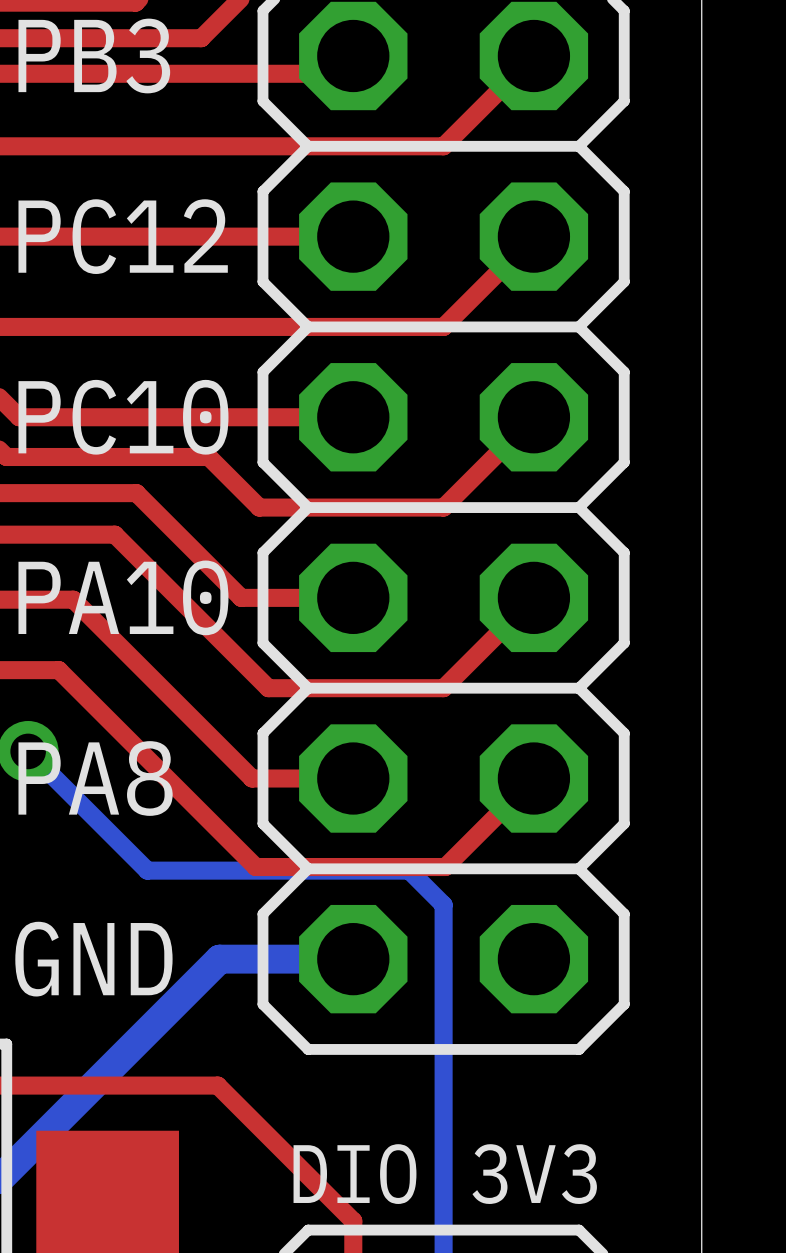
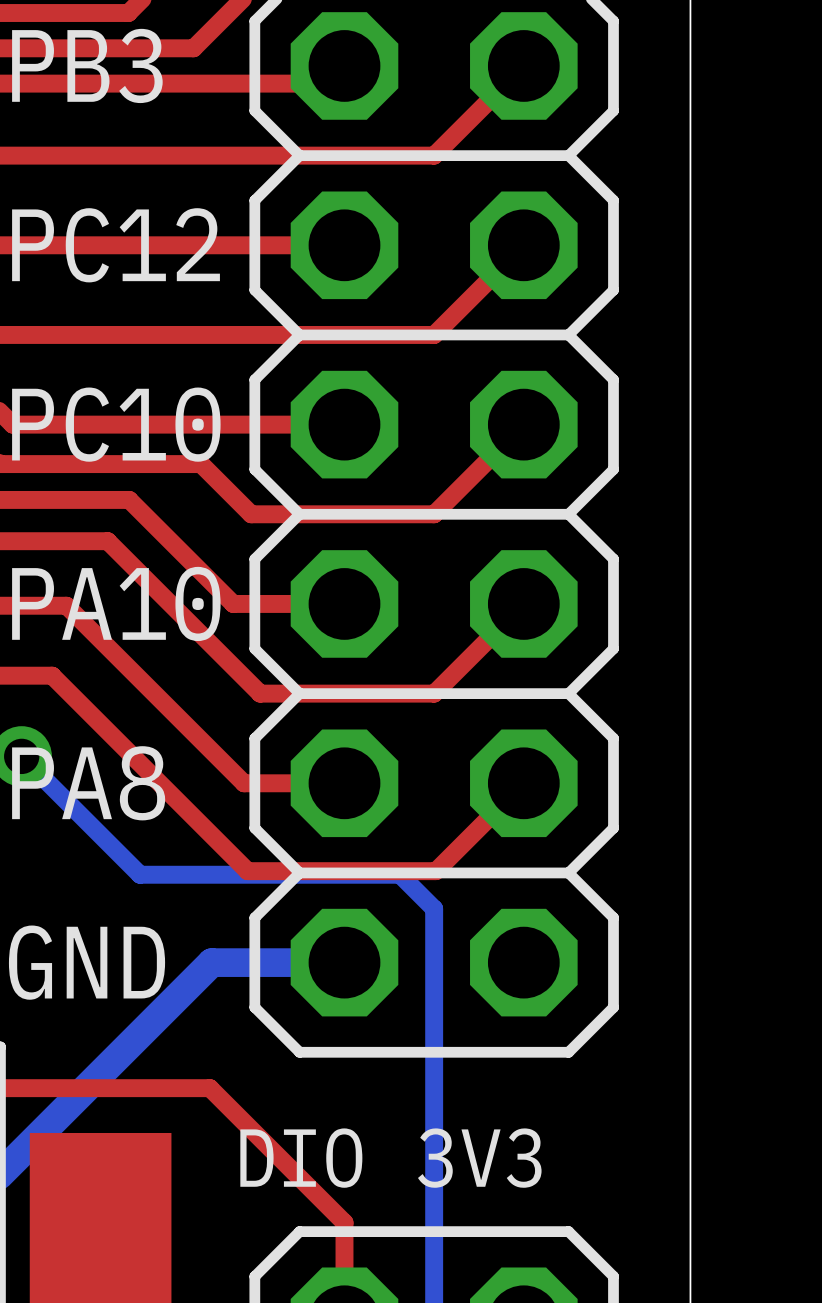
text position: DIO (354, 1174) -> DIO (301, 1158)
text position: 3V3 (534, 1174) -> 3V3 (479, 1158)

